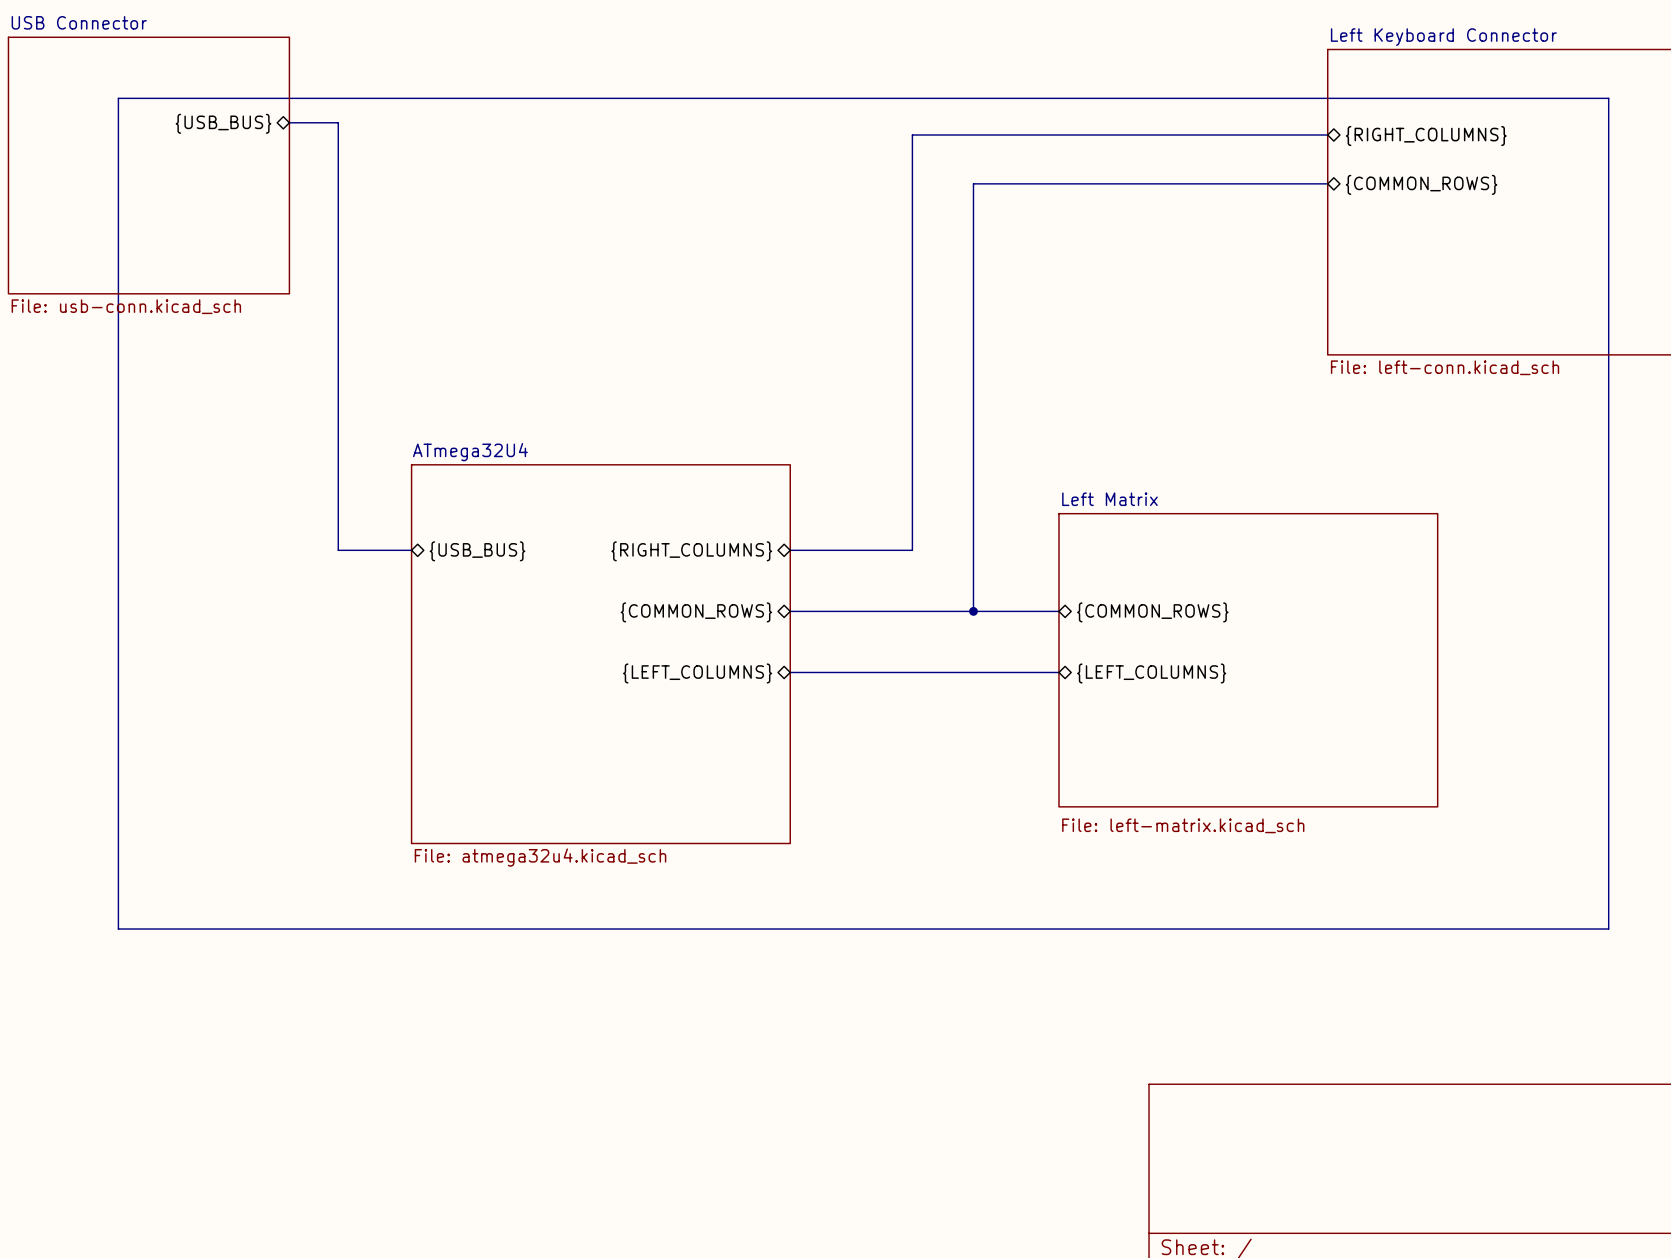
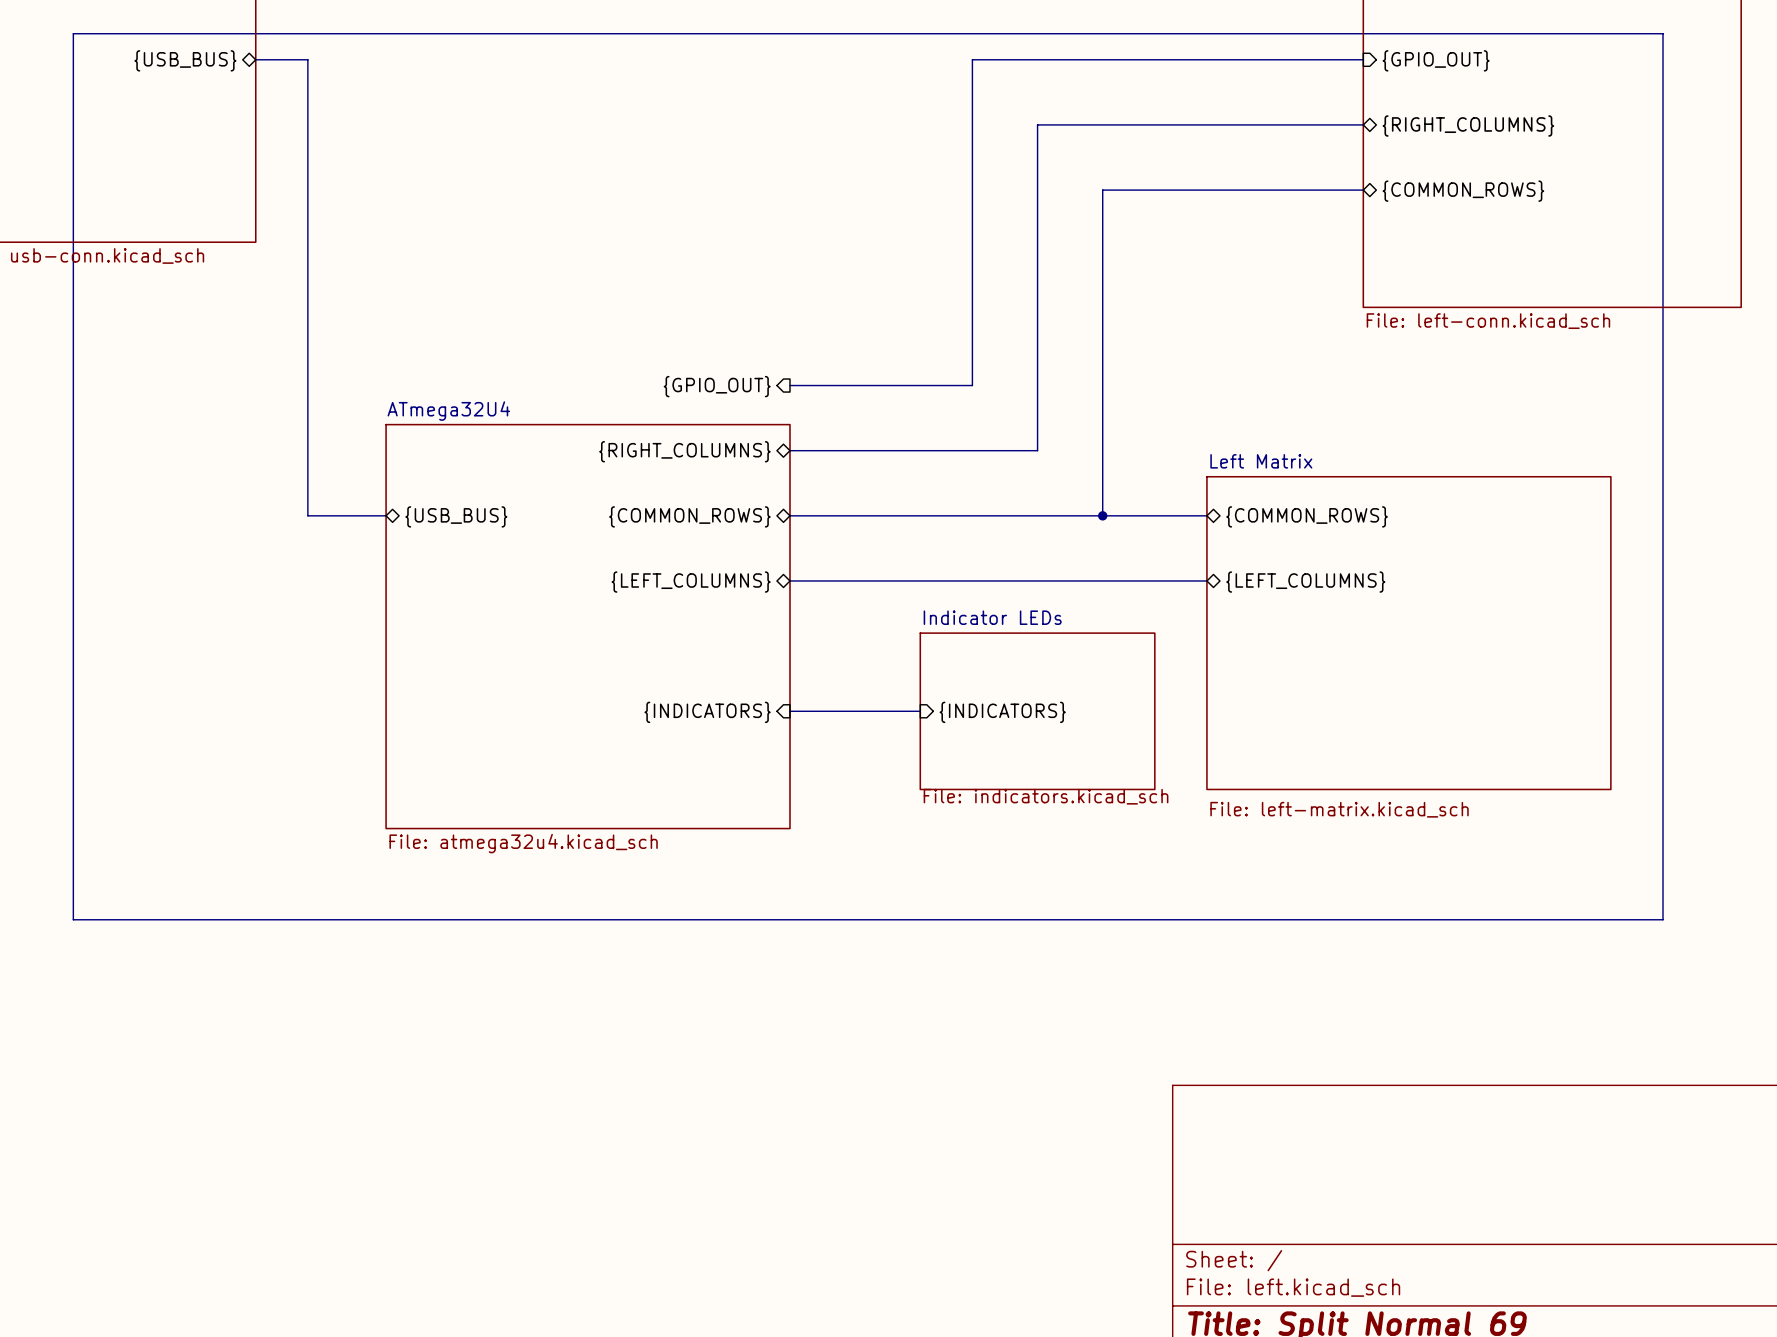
bus: none -> (1363, 59) (972, 59) (972, 385) (789, 385)
sheet pin: none -> {GPIO_OUT} (1436, 60)
bus: (1327, 135) (912, 135) (912, 550) -> (1206, 515) (920, 515)
sheet pin: {RIGHT_COLUMNS} (1426, 136) -> none
bus: (1022, 183) (973, 183) (973, 611) -> (1037, 124) (1037, 450) (789, 450)
sheet pin: {COMMON_ROWS} (1421, 184) -> {RIGHT_COLUMNS} (1468, 126)
bus: none -> (1363, 190) (1102, 190) (1102, 515)
sheet pin: none -> {COMMON_ROWS} (1463, 191)
sheet pin: none -> {GPIO_OUT} (717, 386)
sheet pin: none -> {RIGHT_COLUMNS} (684, 451)
junction: none -> (1102, 515)
sheet pin: {RIGHT_COLUMNS} (691, 551) -> {COMMON_ROWS} (689, 516)
junction: (973, 611) -> none
bus: none -> (1076, 580) (1206, 580)
sheet pin: {COMMON_ROWS} (696, 612) -> {LEFT_COLUMNS} (691, 582)
sheet pin position: {COMMON_ROWS} (1152, 612) -> {COMMON_ROWS} (1307, 516)
sheet Left Matrix position: (1248, 660) -> (1408, 633)
bus: (790, 672) (1058, 672) -> none
sheet pin: {LEFT_COLUMNS} (697, 673) -> none
sheet pin position: {LEFT_COLUMNS} (1151, 673) -> {LEFT_COLUMNS} (1305, 582)
bus: none -> (789, 711) (920, 711)
sheet Indicator LEDs: none -> File: indicators.kicad_sch (1037, 711)
sheet pin: none -> {INDICATORS} (707, 712)
sheet pin: none -> {INDICATORS} (1002, 712)

